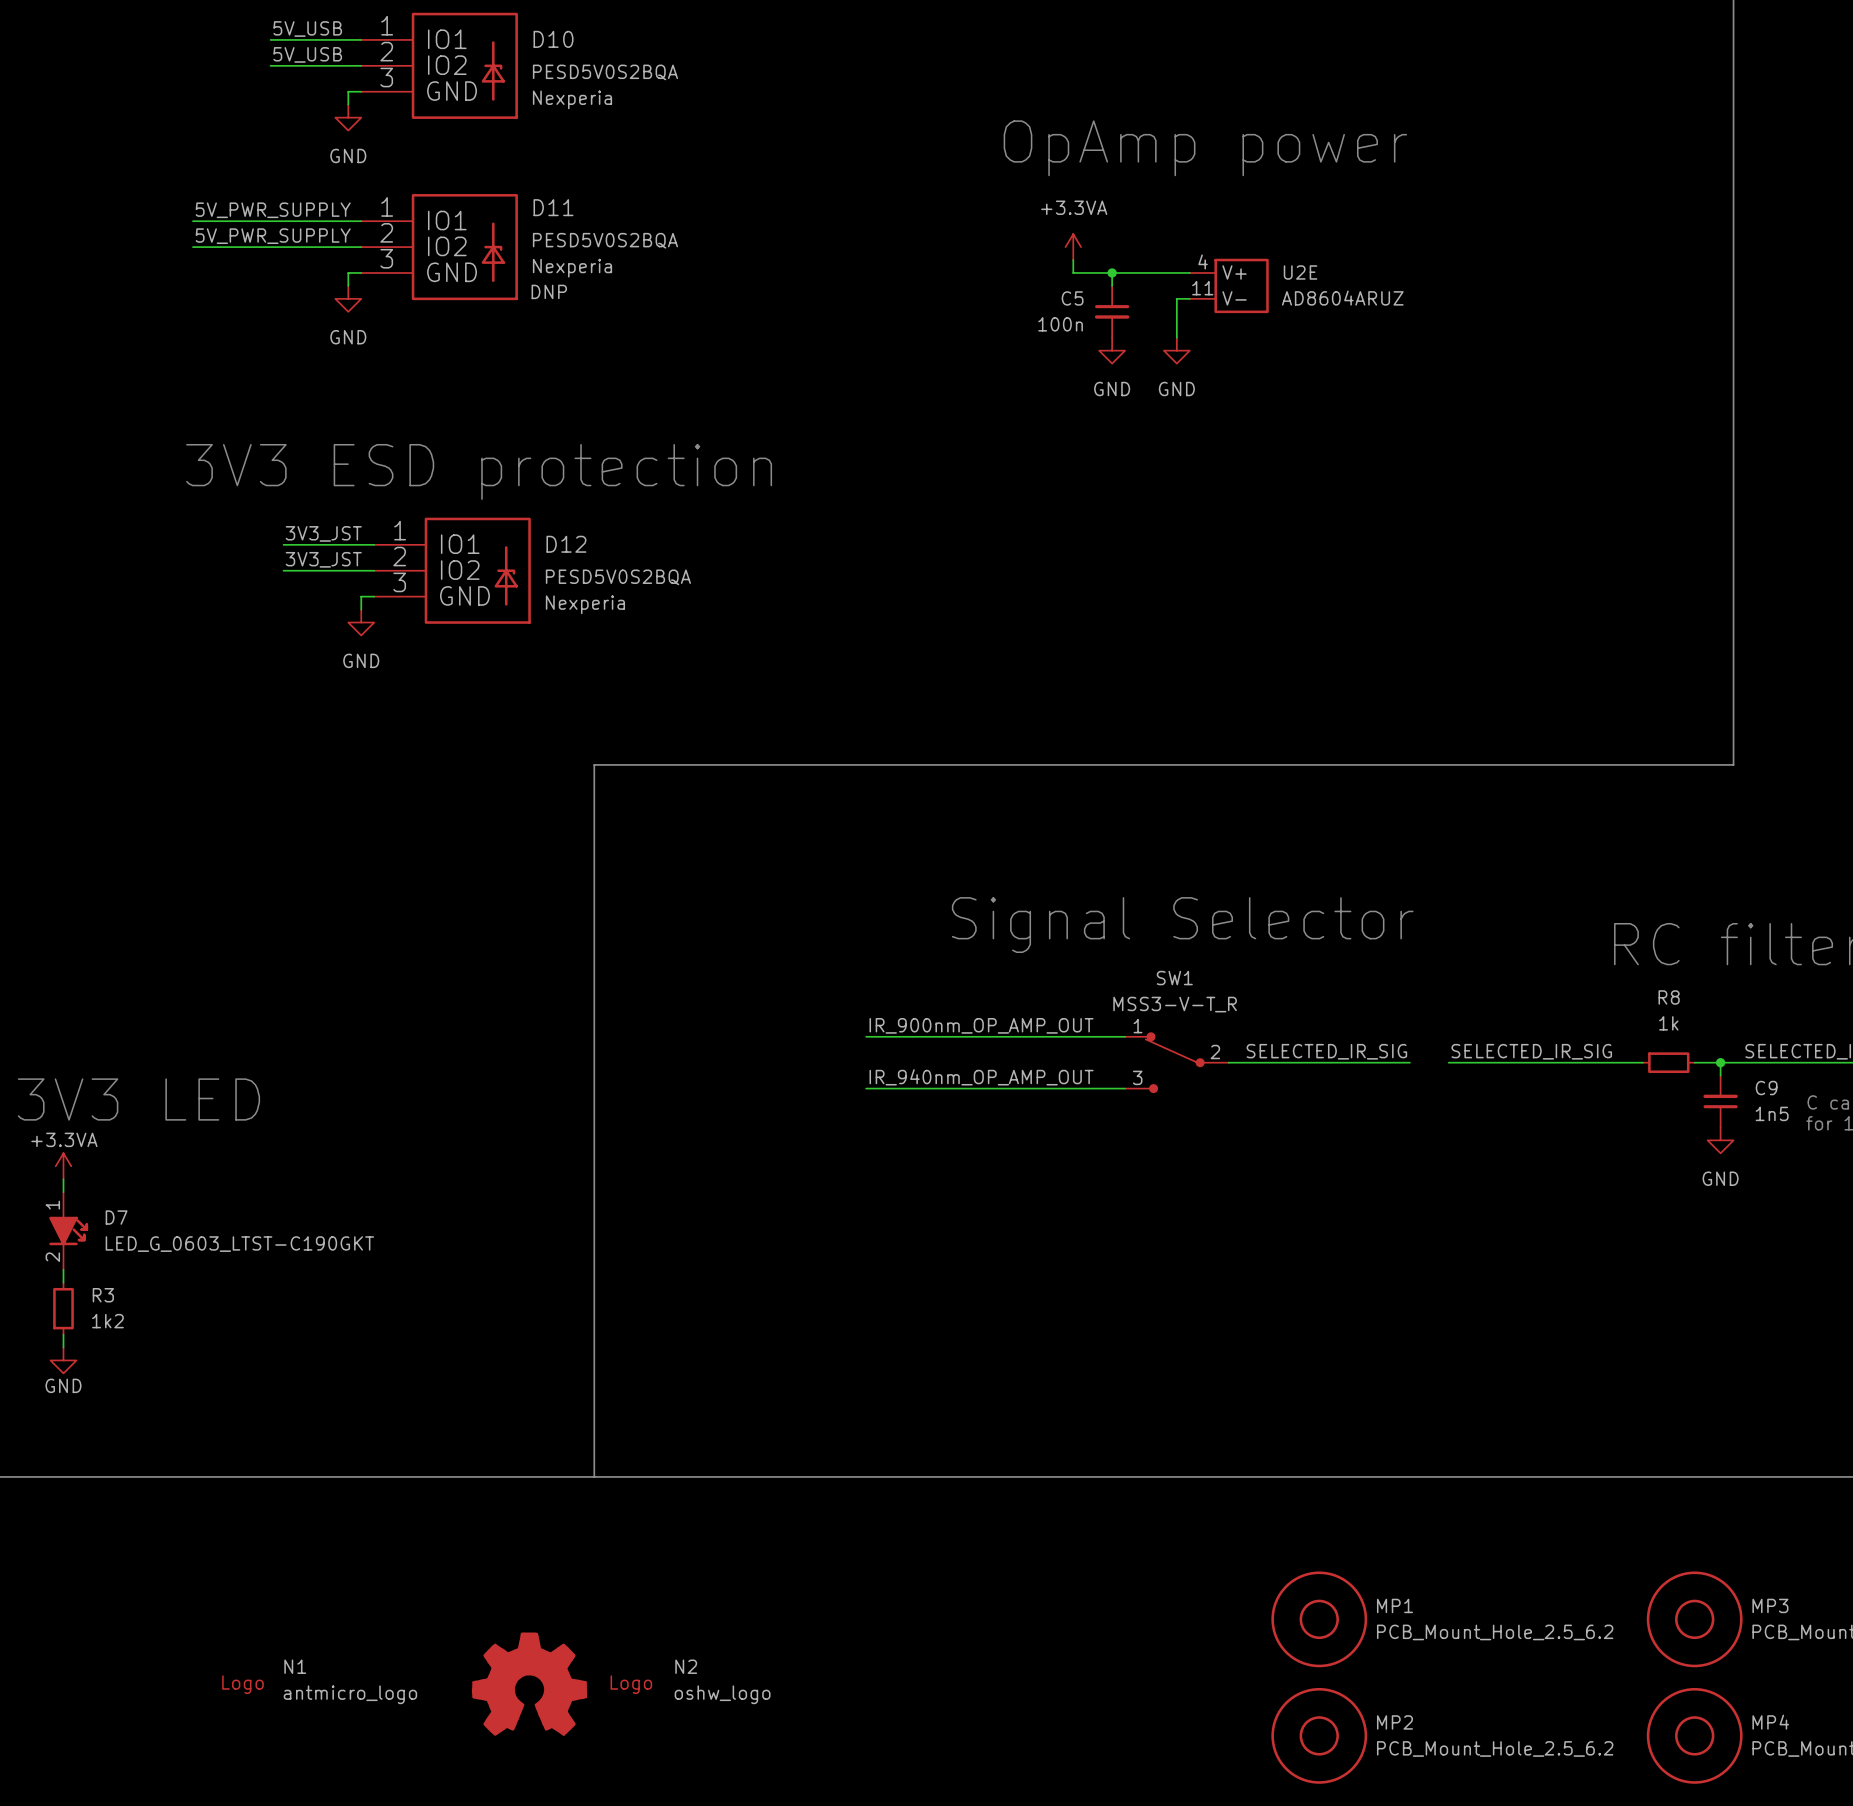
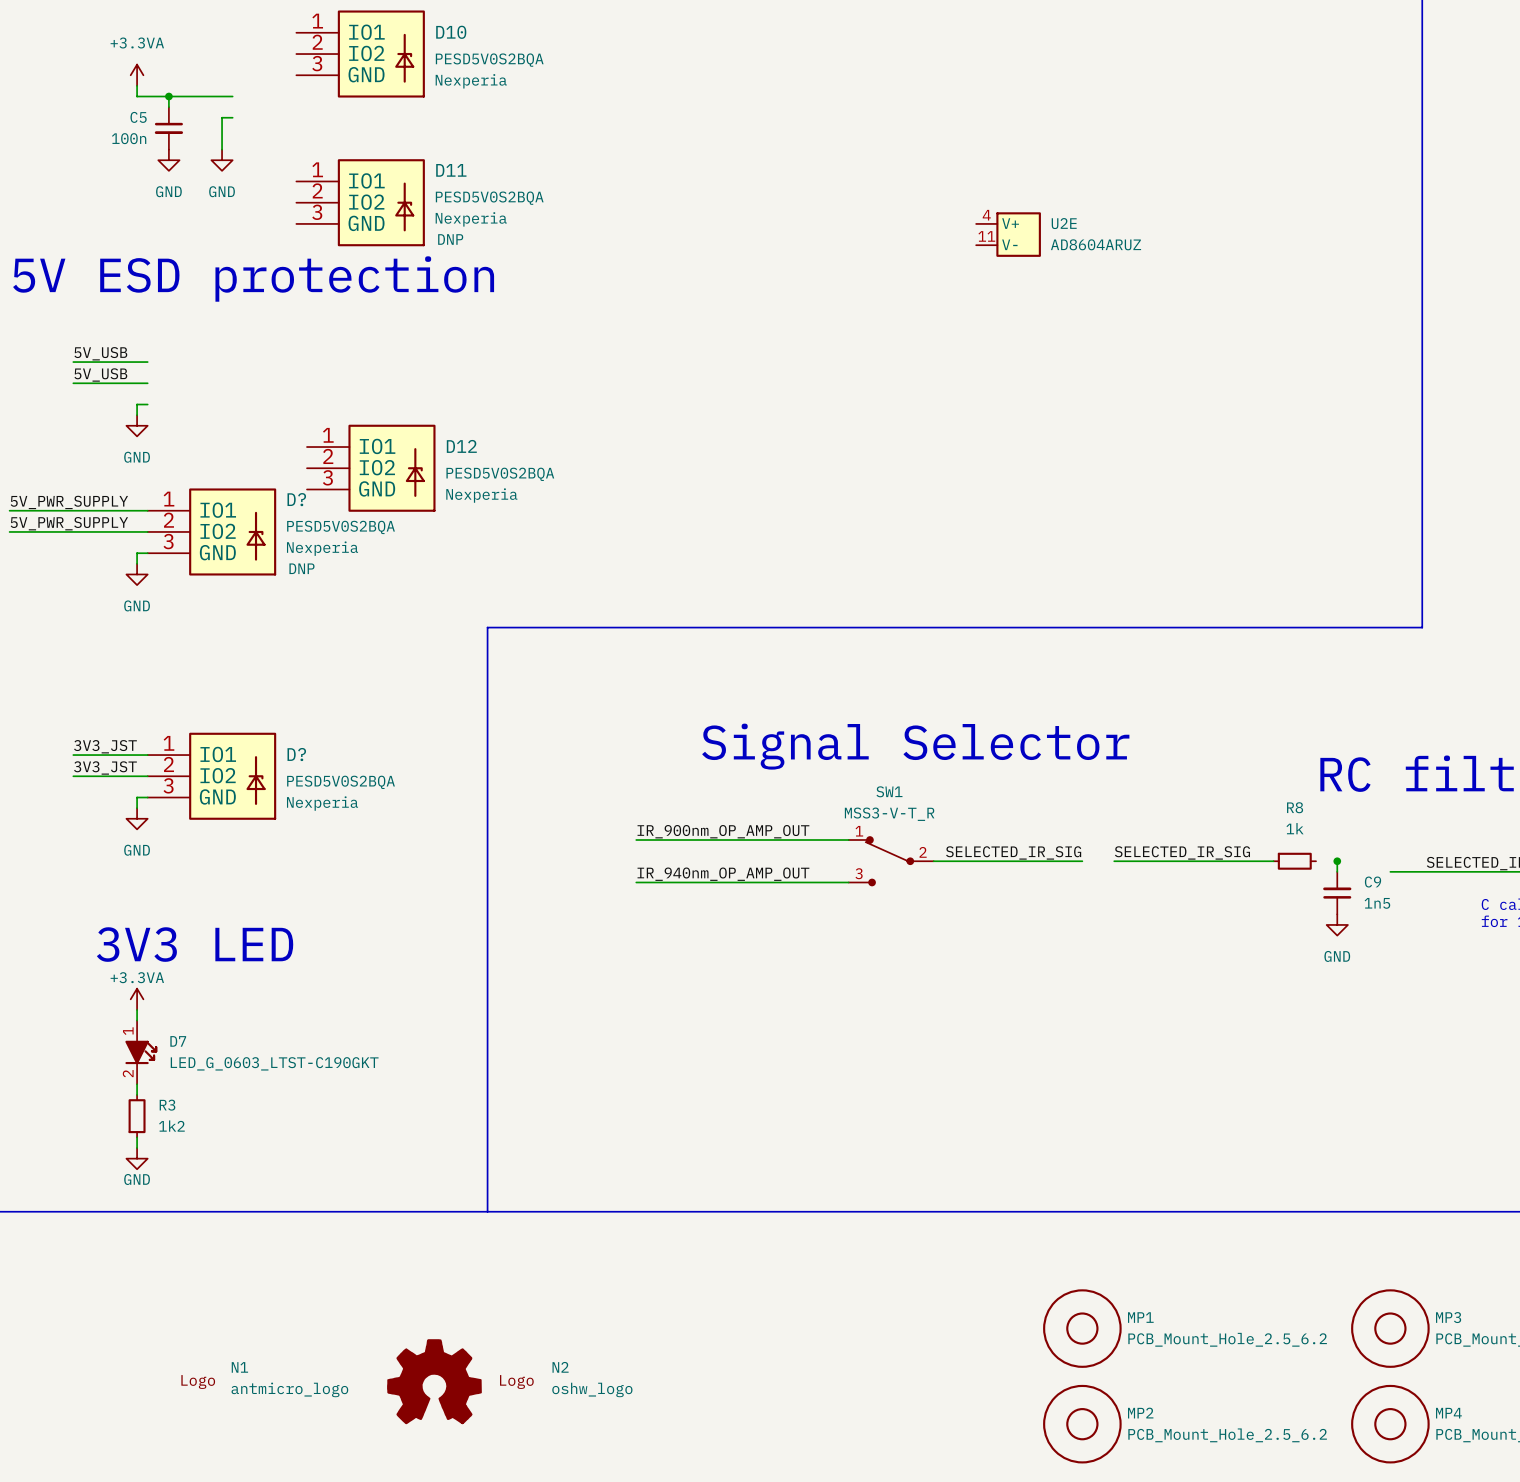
label: 5V_USB (307, 29) -> none
wire: (270, 39) (361, 39) -> none
label: 5V_USB (307, 54) -> none
wire: (270, 65) (361, 65) -> none
power symbol: none -> +3.3VA (137, 75)
wire: (361, 91) (348, 91) (348, 104) -> none
wire: none -> (137, 85) (137, 96) (232, 96)
wire: none -> (168, 96) (168, 107)
junction: none -> (168, 96)
power symbol: GND (348, 117) -> none
wire: none -> (232, 117) (222, 117) (222, 149)
text: OpAmp power (1205, 148) -> none
power symbol: none -> GND (168, 160)
power symbol: none -> GND (222, 160)
label: 5V_PWR_SUPPLY (273, 210) -> none
wire: (192, 221) (361, 221) -> none
label: 5V_PWR_SUPPLY (273, 236) -> none
wire: (192, 247) (361, 247) -> none
power symbol: +3.3VA (1073, 247) -> none
wire: (1073, 260) (1073, 272) (1189, 272) -> none
wire: (361, 272) (348, 272) (348, 285) -> none
wire: (1112, 272) (1112, 285) -> none
junction: (1112, 272) -> none
power symbol: GND (348, 298) -> none
wire: (1189, 298) (1176, 298) (1176, 337) -> none
C5 position: (1112, 311) -> (168, 128)
text: none -> 5V ESD protection (253, 278)
power symbol: GND (1112, 350) -> none
power symbol: GND (1176, 350) -> none
label: none -> 5V_USB (100, 353)
label: none -> 5V_USB (100, 374)
text: 3V3 ESD protection (479, 471) -> none
power symbol: none -> GND (137, 425)
label: 3V3_JST (323, 533) -> none
wire: (283, 544) (374, 544) -> (73, 362) (147, 362)
label: 3V3_JST (323, 559) -> none
wire: (283, 570) (374, 570) -> (73, 383) (147, 383)
wire: (374, 596) (361, 596) (361, 609) -> (147, 404) (137, 404) (137, 415)
label: none -> 5V_PWR_SUPPLY (69, 502)
wire: none -> (9, 510) (147, 510)
power symbol: GND (361, 622) -> none
label: none -> 5V_PWR_SUPPLY (69, 523)
wire: none -> (9, 531) (147, 531)
D?: none -> (211, 531)
wire: none -> (147, 553) (137, 553) (137, 563)
power symbol: none -> GND (137, 574)
label: none -> 3V3_JST (105, 746)
wire: none -> (73, 755) (147, 755)
text position: Signal Selector (1182, 925) -> Signal Selector (915, 746)
label: none -> 3V3_JST (105, 767)
wire: none -> (73, 776) (147, 776)
D?: none -> (211, 776)
wire: none -> (147, 797) (137, 797) (137, 808)
power symbol: none -> GND (137, 818)
label position: IR_900nm_OP_AMP_OUT (981, 1025) -> IR_900nm_OP_AMP_OUT (723, 831)
wire: (866, 1036) (1125, 1036) -> (636, 840) (848, 840)
label: none -> SELECTED_IR_SIG (1013, 852)
label: none -> SELECTED_IR_SIG (1182, 852)
junction: none -> (1337, 861)
label: SELECTED_IR_SIG (1326, 1051) -> none
label: SELECTED_IR_SIG (1531, 1051) -> none
SW1 position: (1176, 1062) -> (891, 861)
wire: (1228, 1062) (1409, 1062) -> (933, 861) (1082, 861)
wire: (1448, 1062) (1642, 1062) -> (1114, 861) (1273, 861)
R8 position: (1668, 1062) -> (1294, 861)
wire: (1720, 1062) (1720, 1075) -> (1337, 861) (1337, 871)
junction: (1720, 1062) -> none
label position: IR_940nm_OP_AMP_OUT (981, 1077) -> IR_940nm_OP_AMP_OUT (723, 874)
wire: (866, 1088) (1125, 1088) -> (636, 882) (848, 882)
text position: 3V3 LED (138, 1099) -> 3V3 LED (195, 944)
C9 position: (1720, 1101) -> (1337, 893)
power symbol position: GND (1720, 1140) -> GND (1337, 924)
power symbol position: +3.3VA (63, 1166) -> +3.3VA (137, 999)
wire: (63, 1179) (63, 1192) -> (137, 1009) (137, 1020)
D7 position: (68, 1230) -> (141, 1052)
wire: (63, 1269) (63, 1282) -> (137, 1084) (137, 1094)
R3 position: (63, 1308) -> (137, 1116)
wire: (63, 1334) (63, 1347) -> (137, 1137) (137, 1148)
power symbol position: GND (63, 1360) -> GND (137, 1158)

